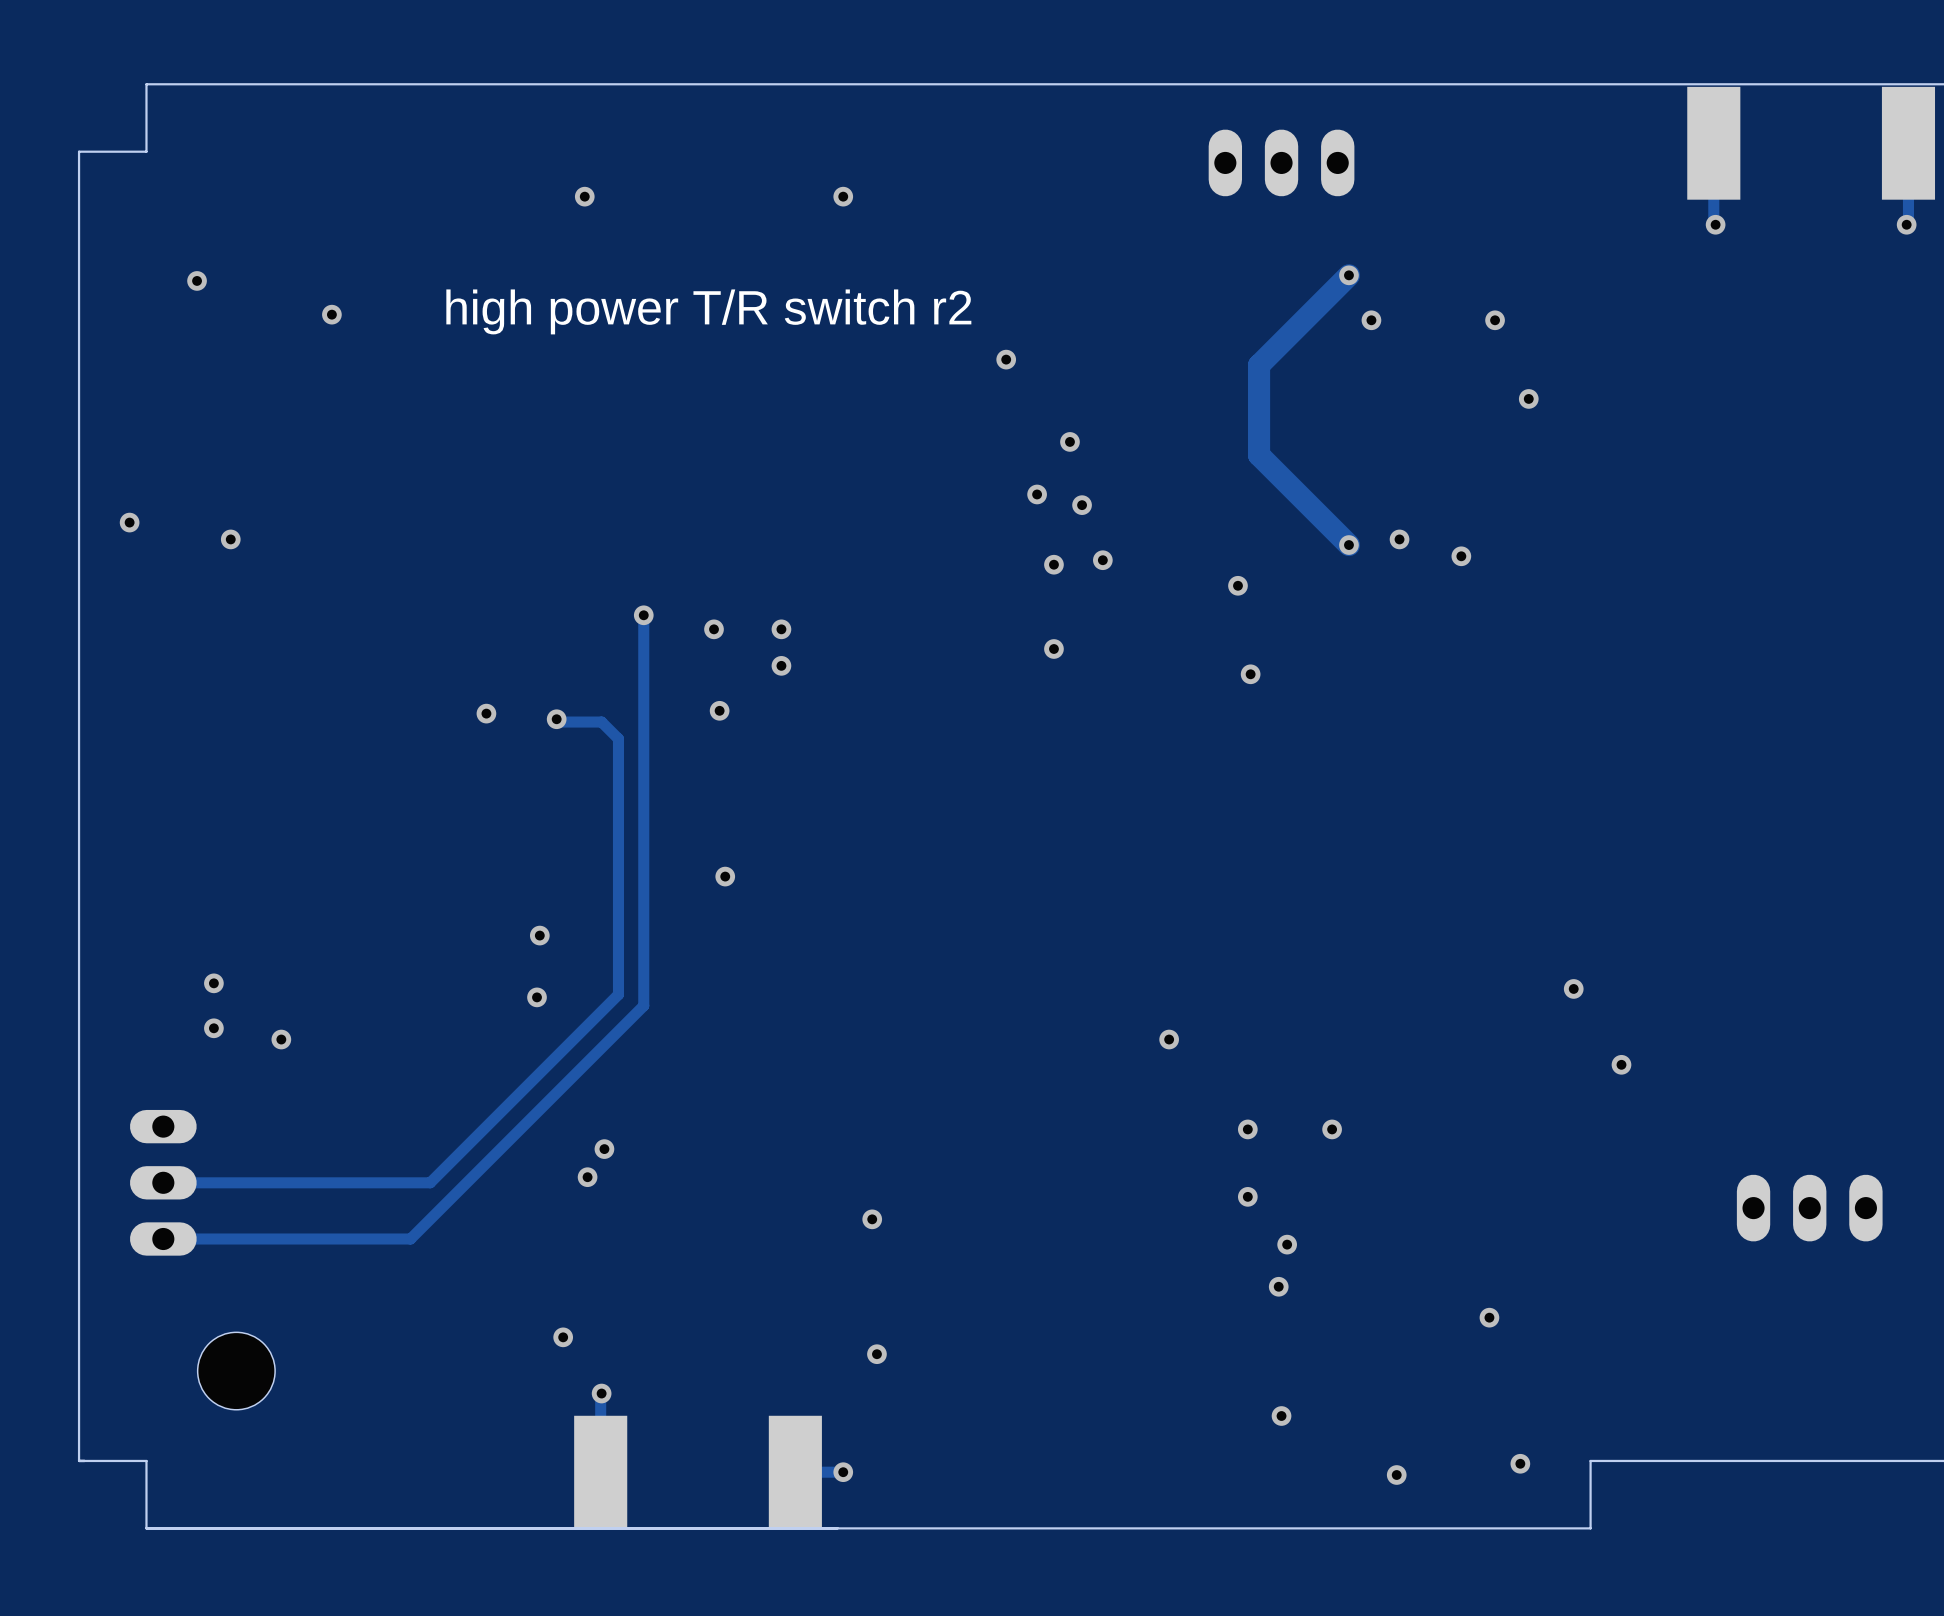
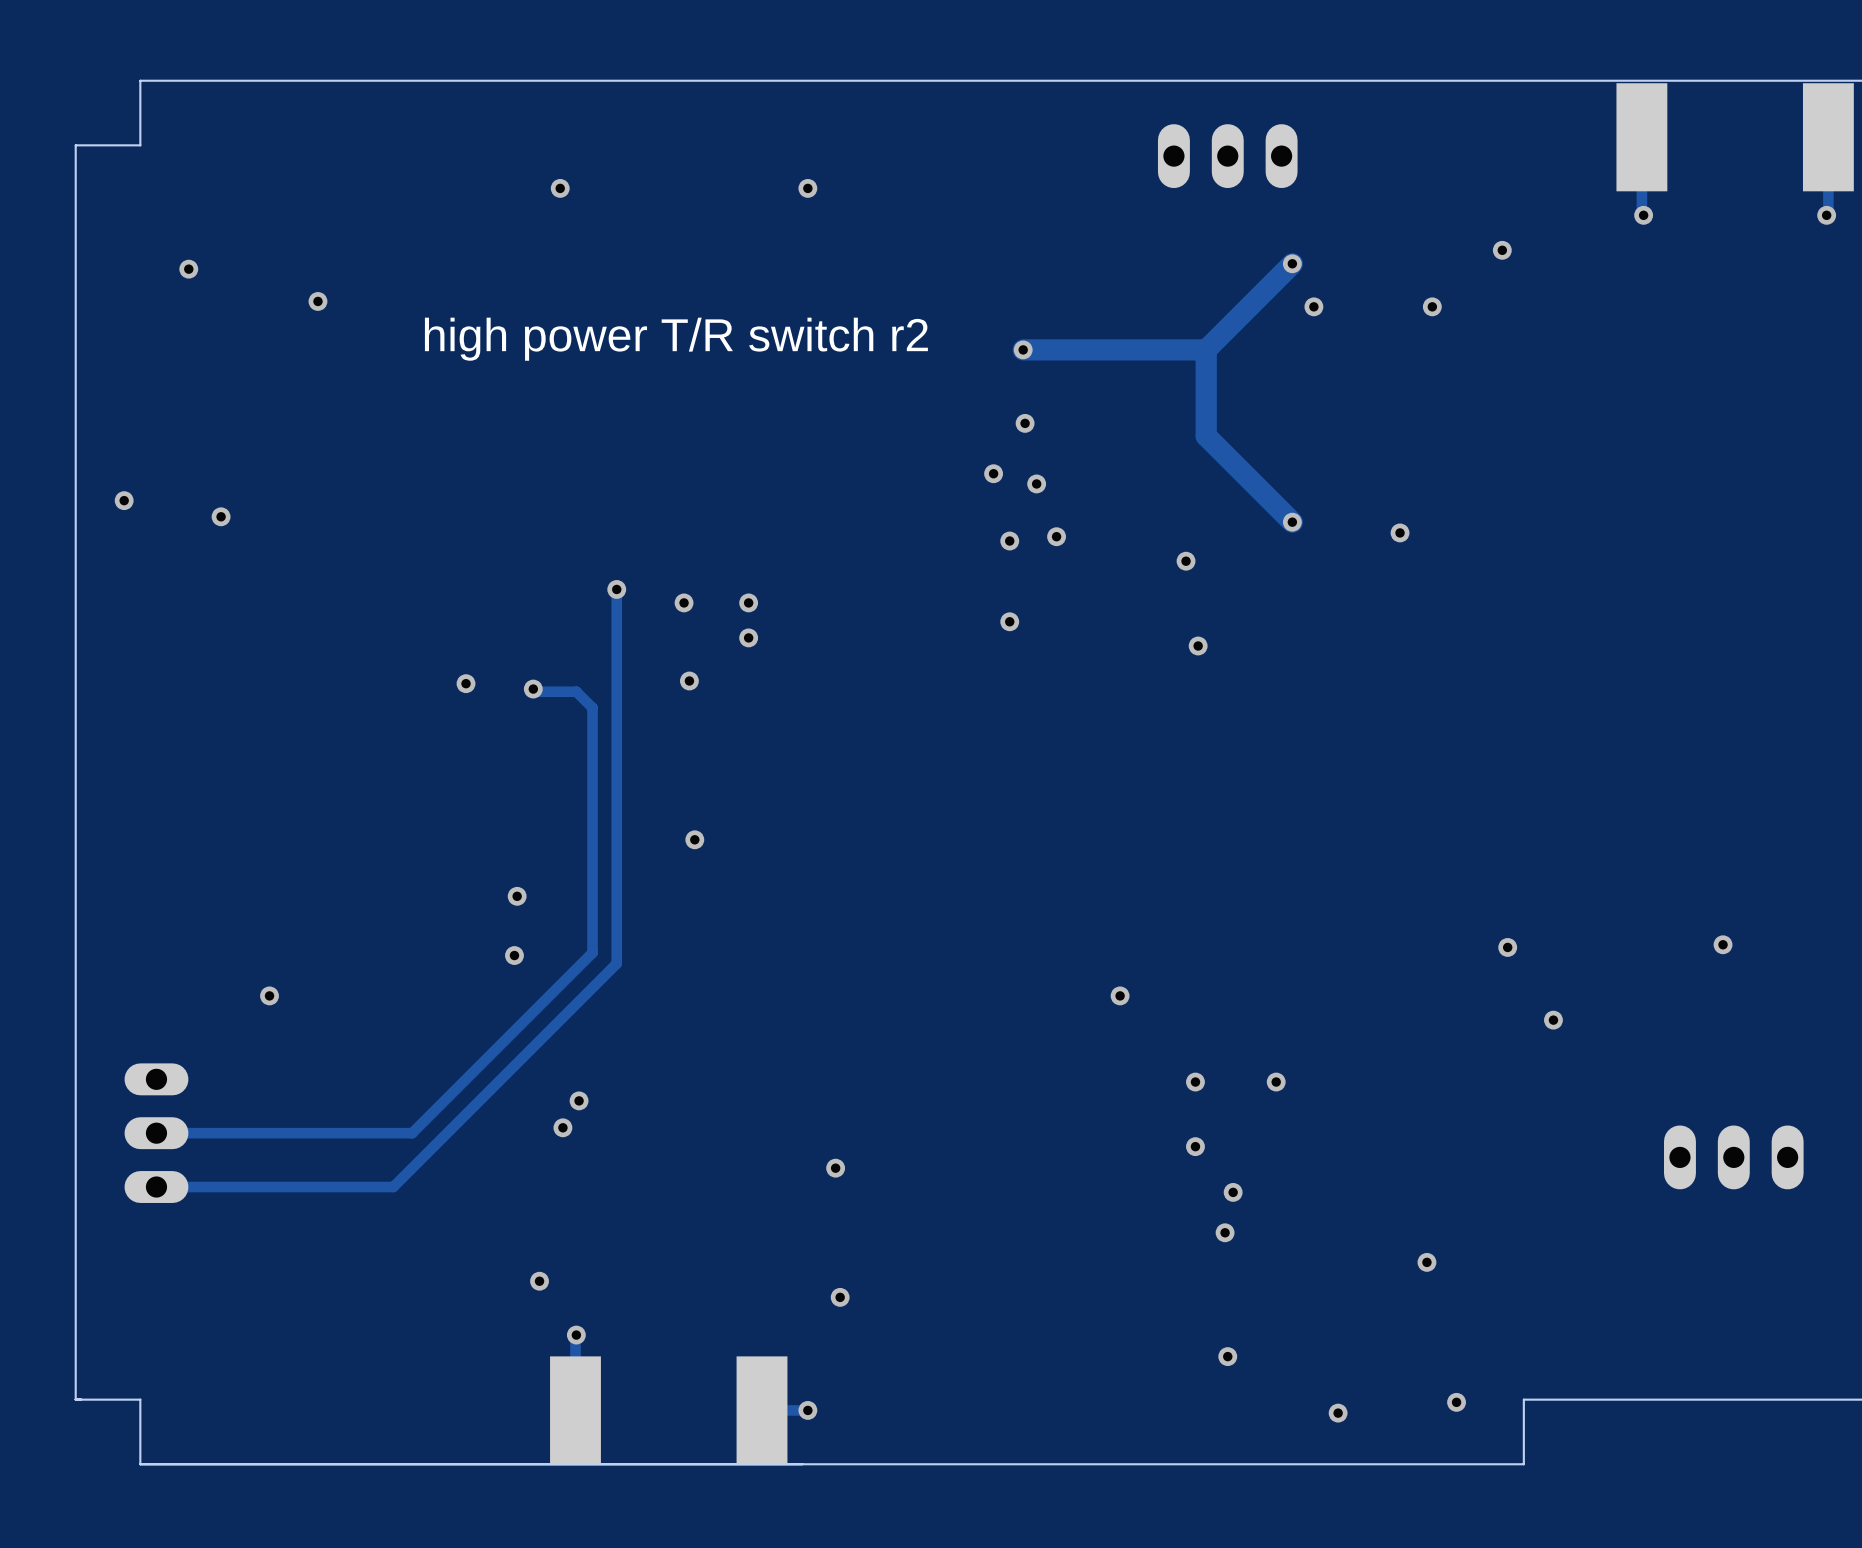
via: none -> (1502, 250)
text position: high power T/R switch r2 (708, 311) -> high power T/R switch r2 (676, 339)
via position: (1006, 359) -> (1023, 349)
track: none -> (1206, 349) (1023, 349)
via: (1528, 398) -> none
via: (1399, 539) -> none
via: (213, 983) -> none
via: none -> (1723, 944)
via: (213, 1028) -> none
part: (236, 1371) -> none

